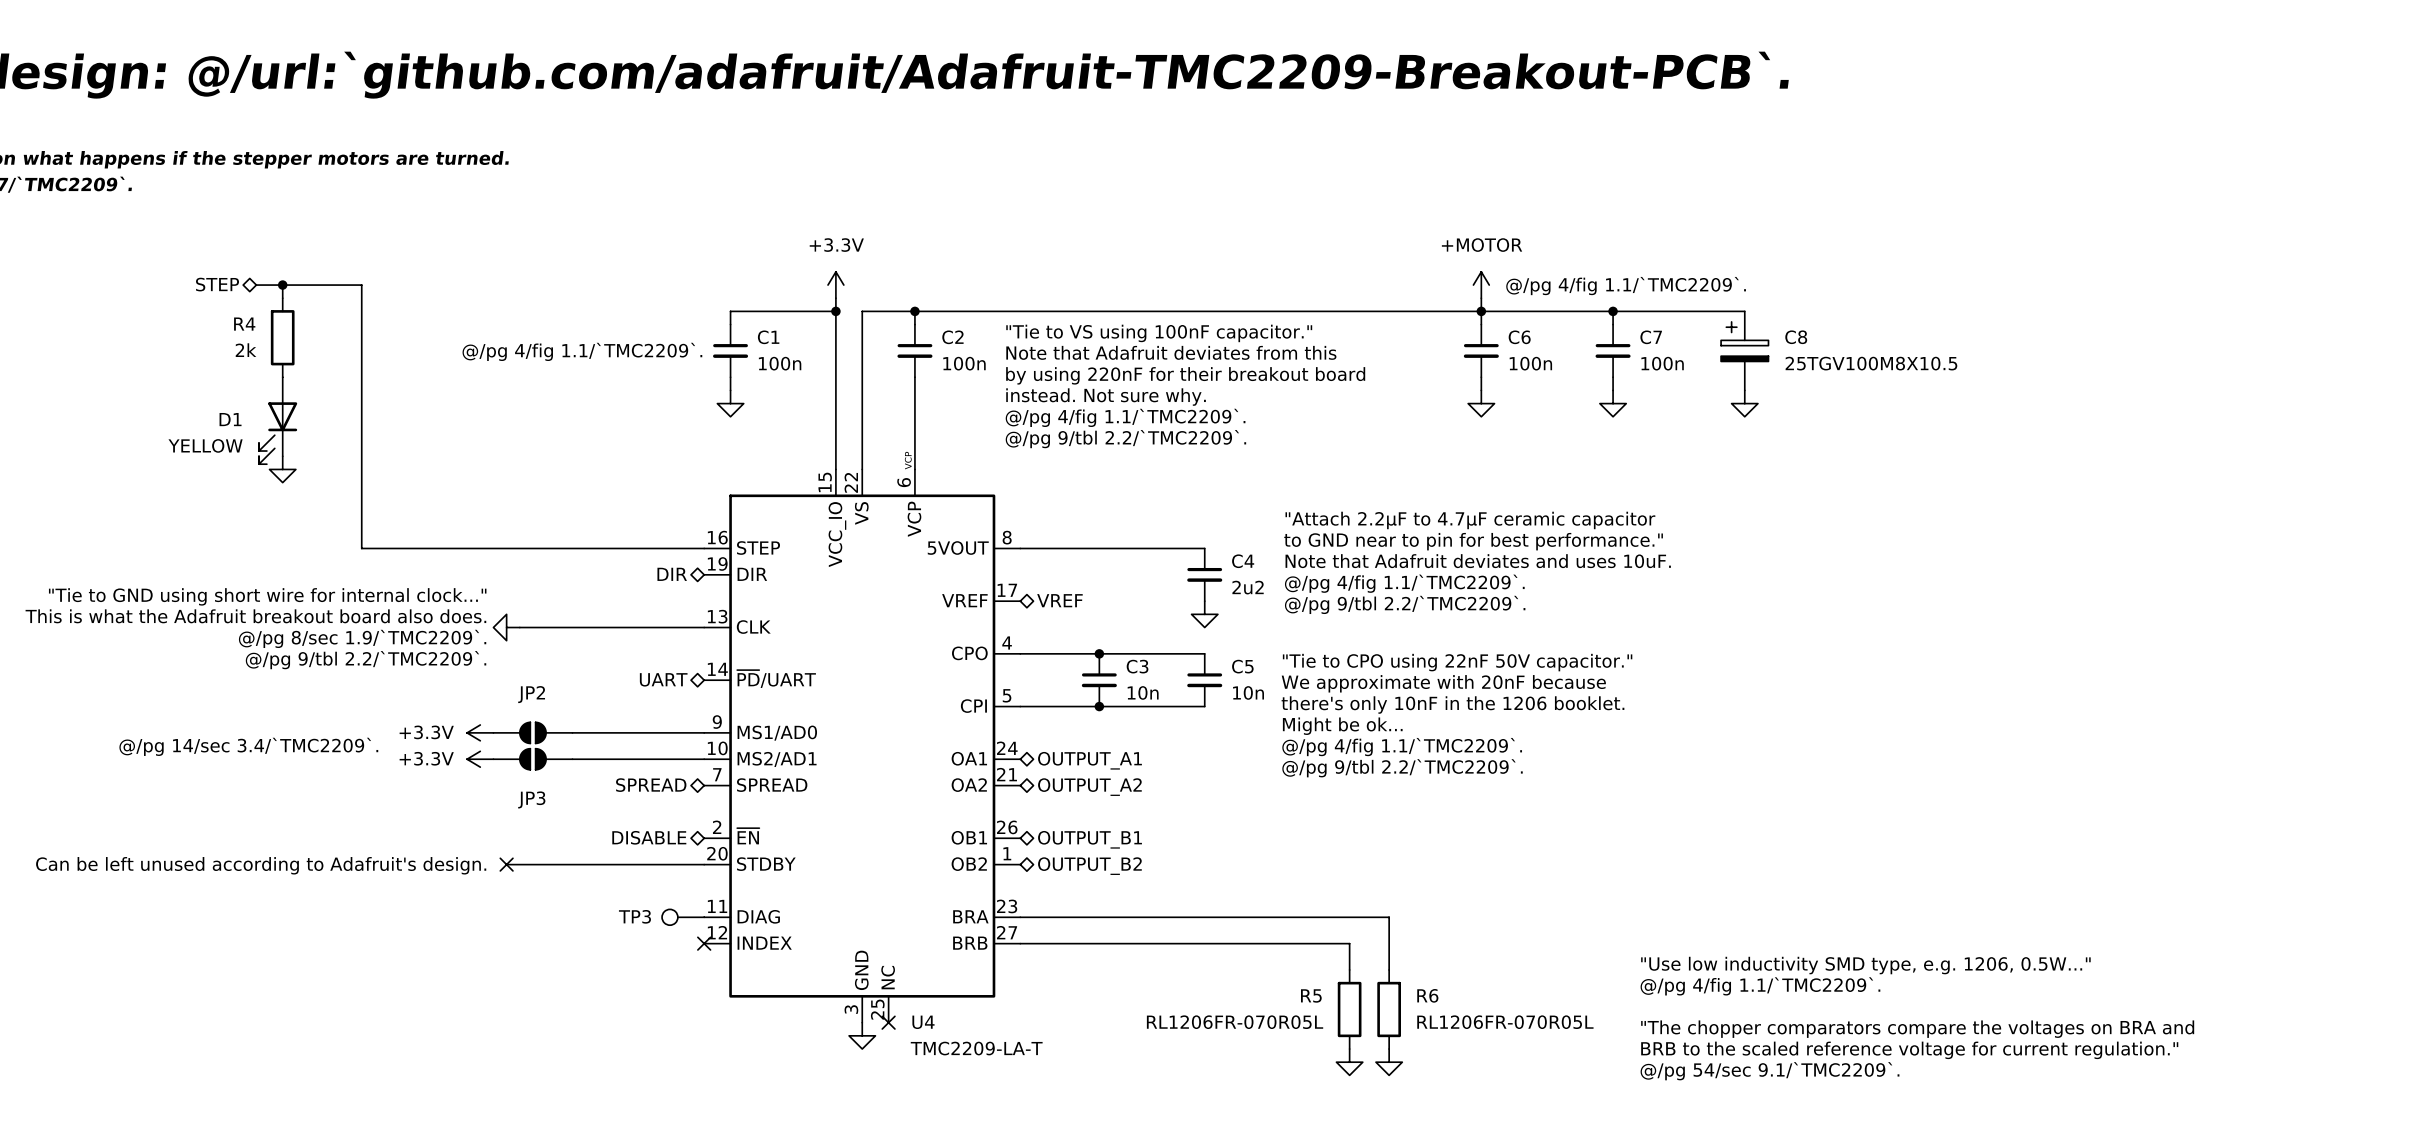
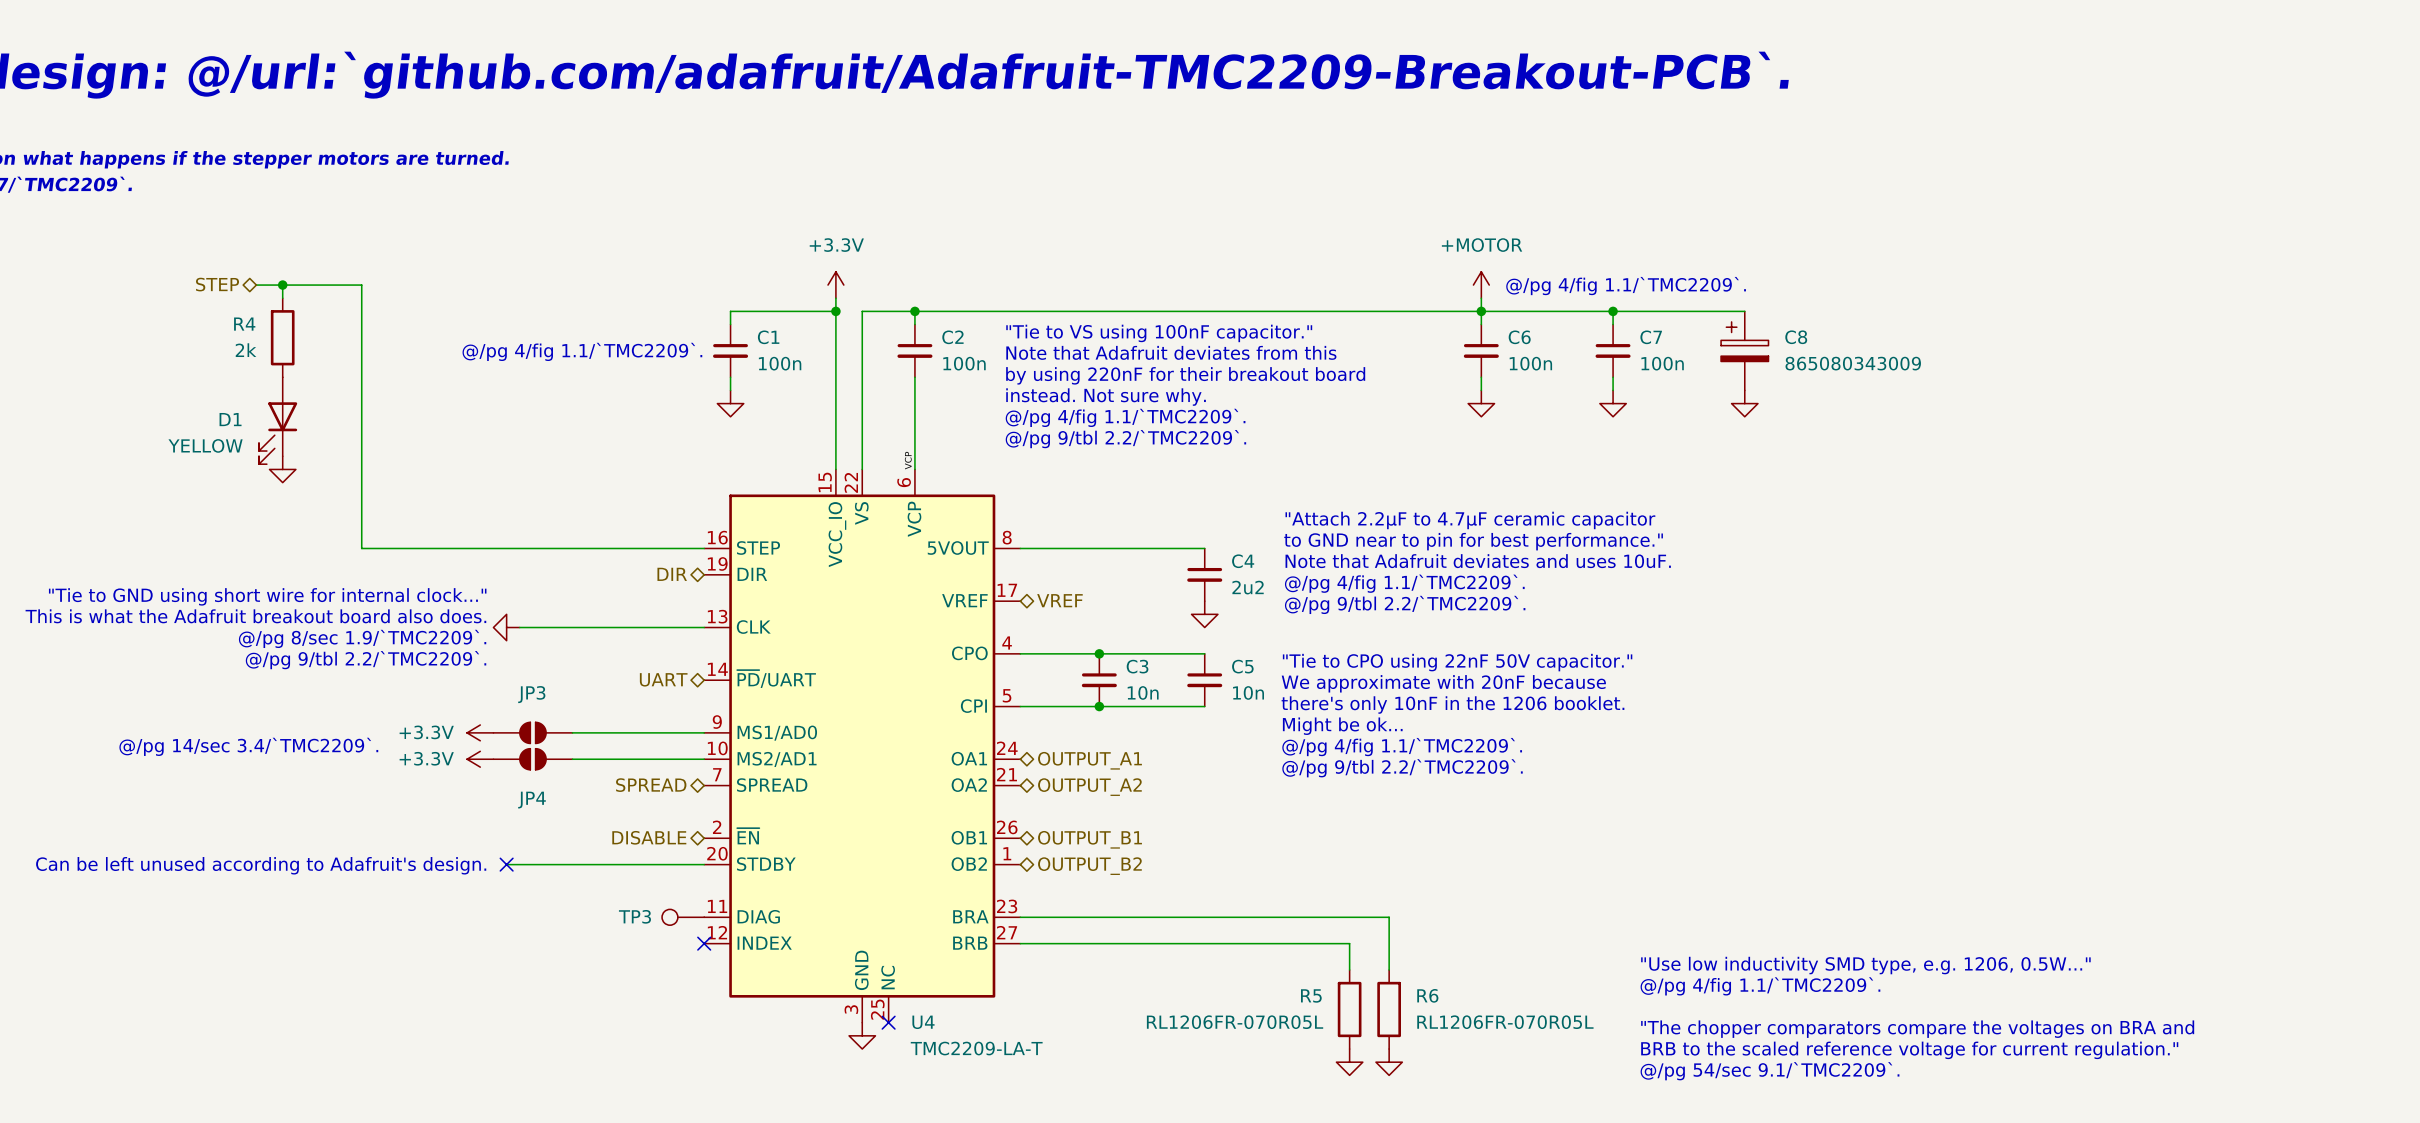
C8 value: 25TGV100M8X10.5 (1871, 363) -> 865080343009 (1853, 363)
JP2 name: JP2 (531, 694) -> JP3 (531, 694)
JP3 name: JP3 (531, 799) -> JP4 (531, 800)

